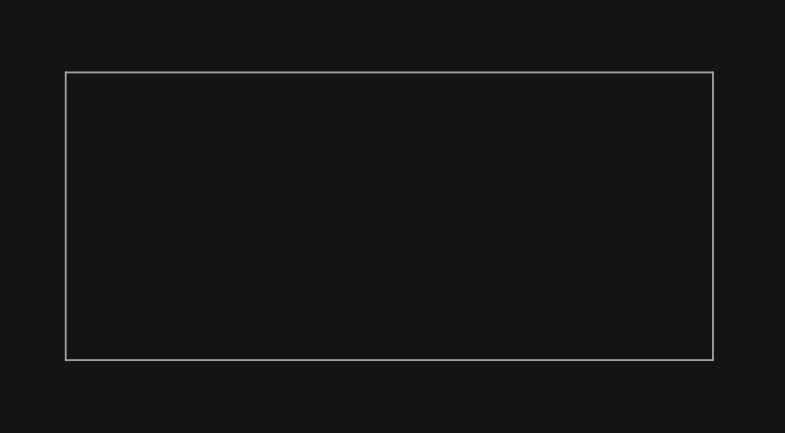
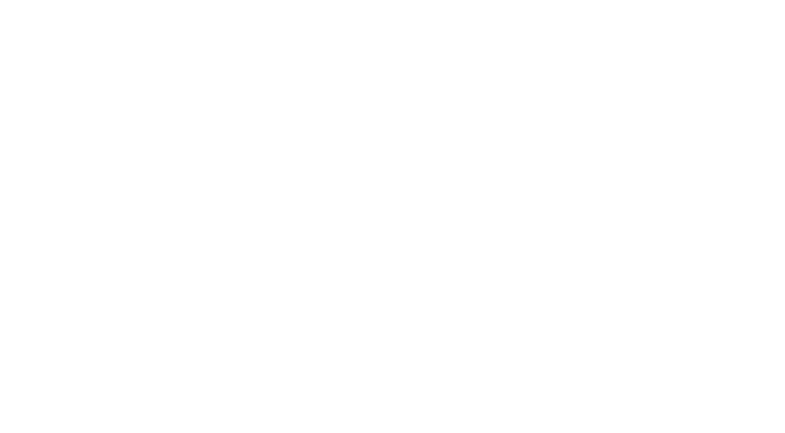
board edge: (712, 72) (65, 72) (65, 360) (712, 360) (712, 72) -> none

